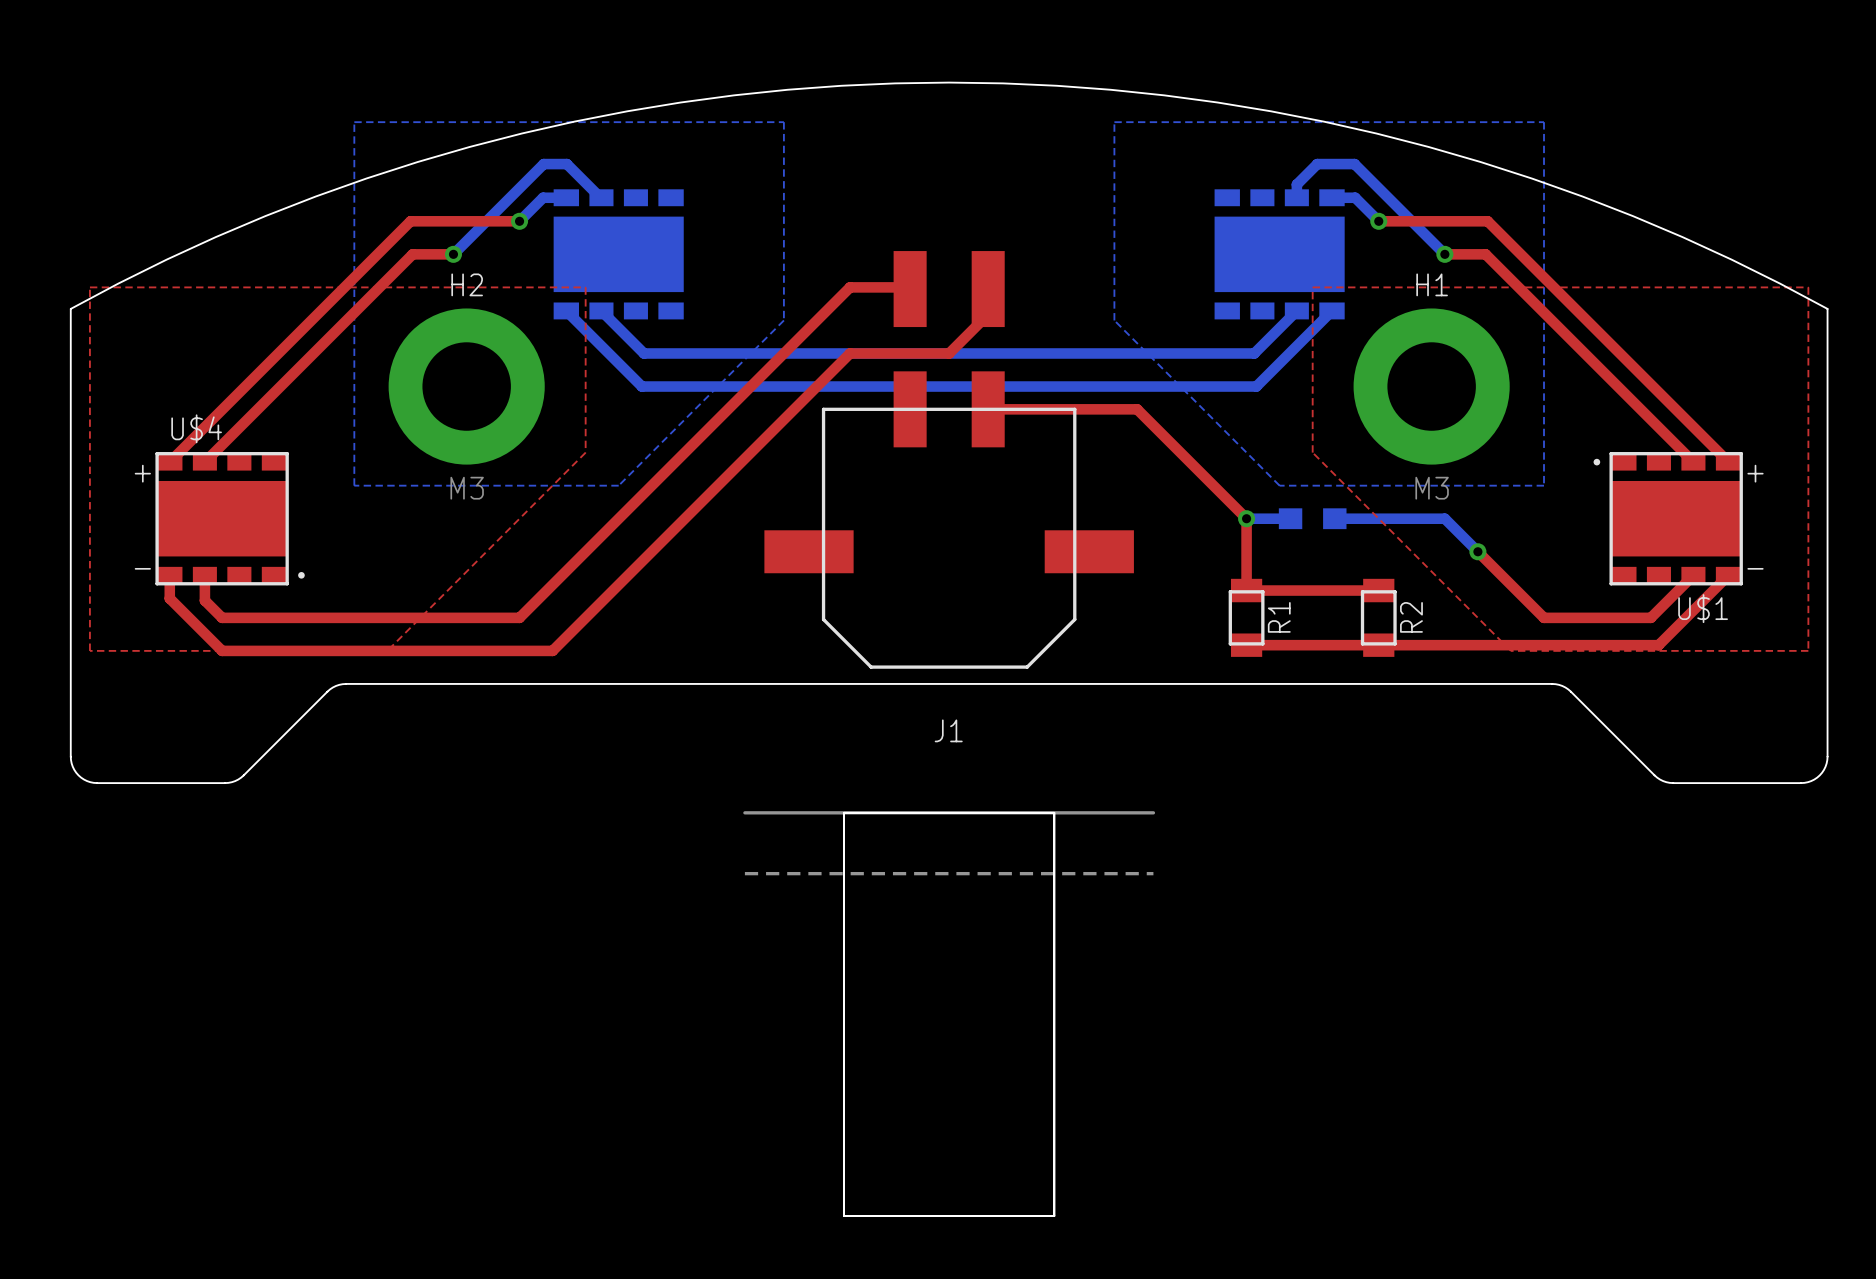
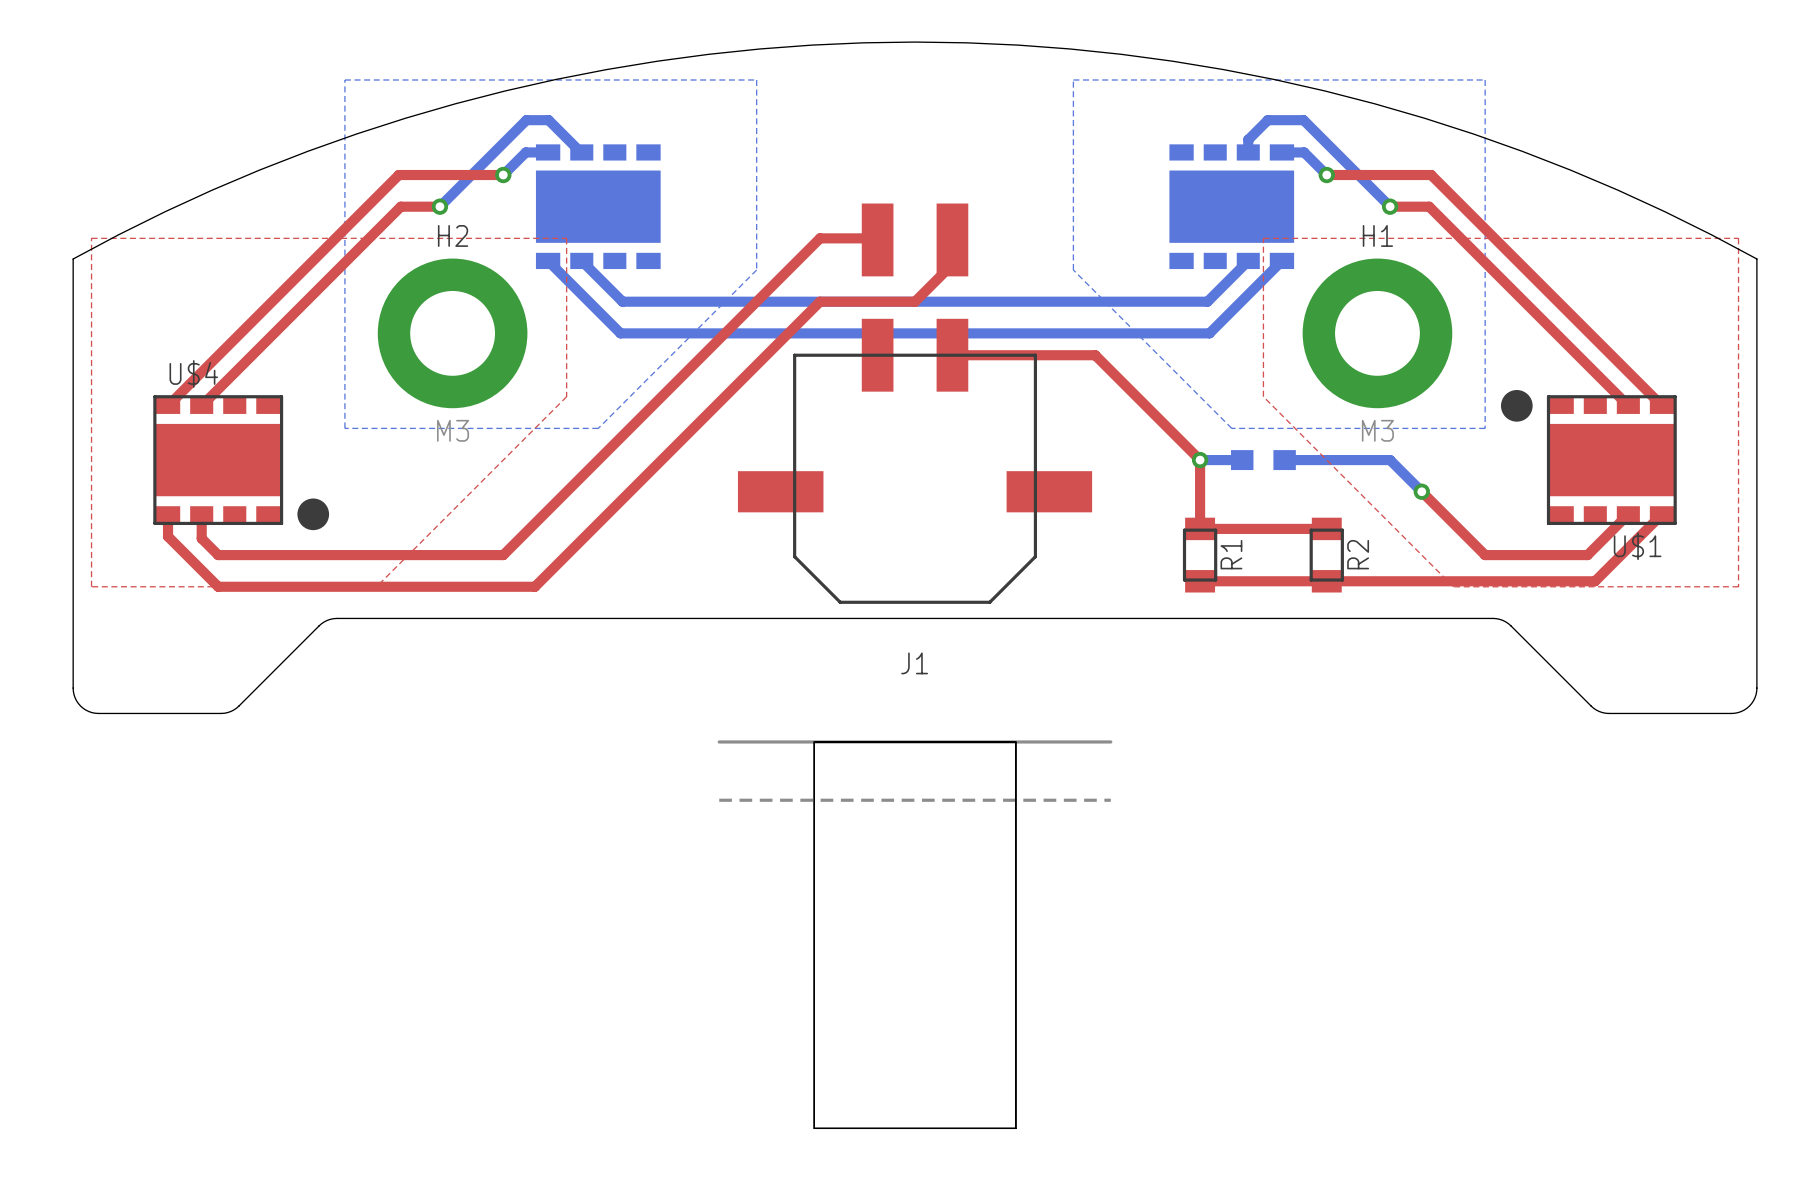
U$4 footprint: [155, 452, 305, 586] -> [153, 395, 330, 531]
U$1 footprint: [1593, 452, 1743, 586] -> [1500, 389, 1677, 526]

